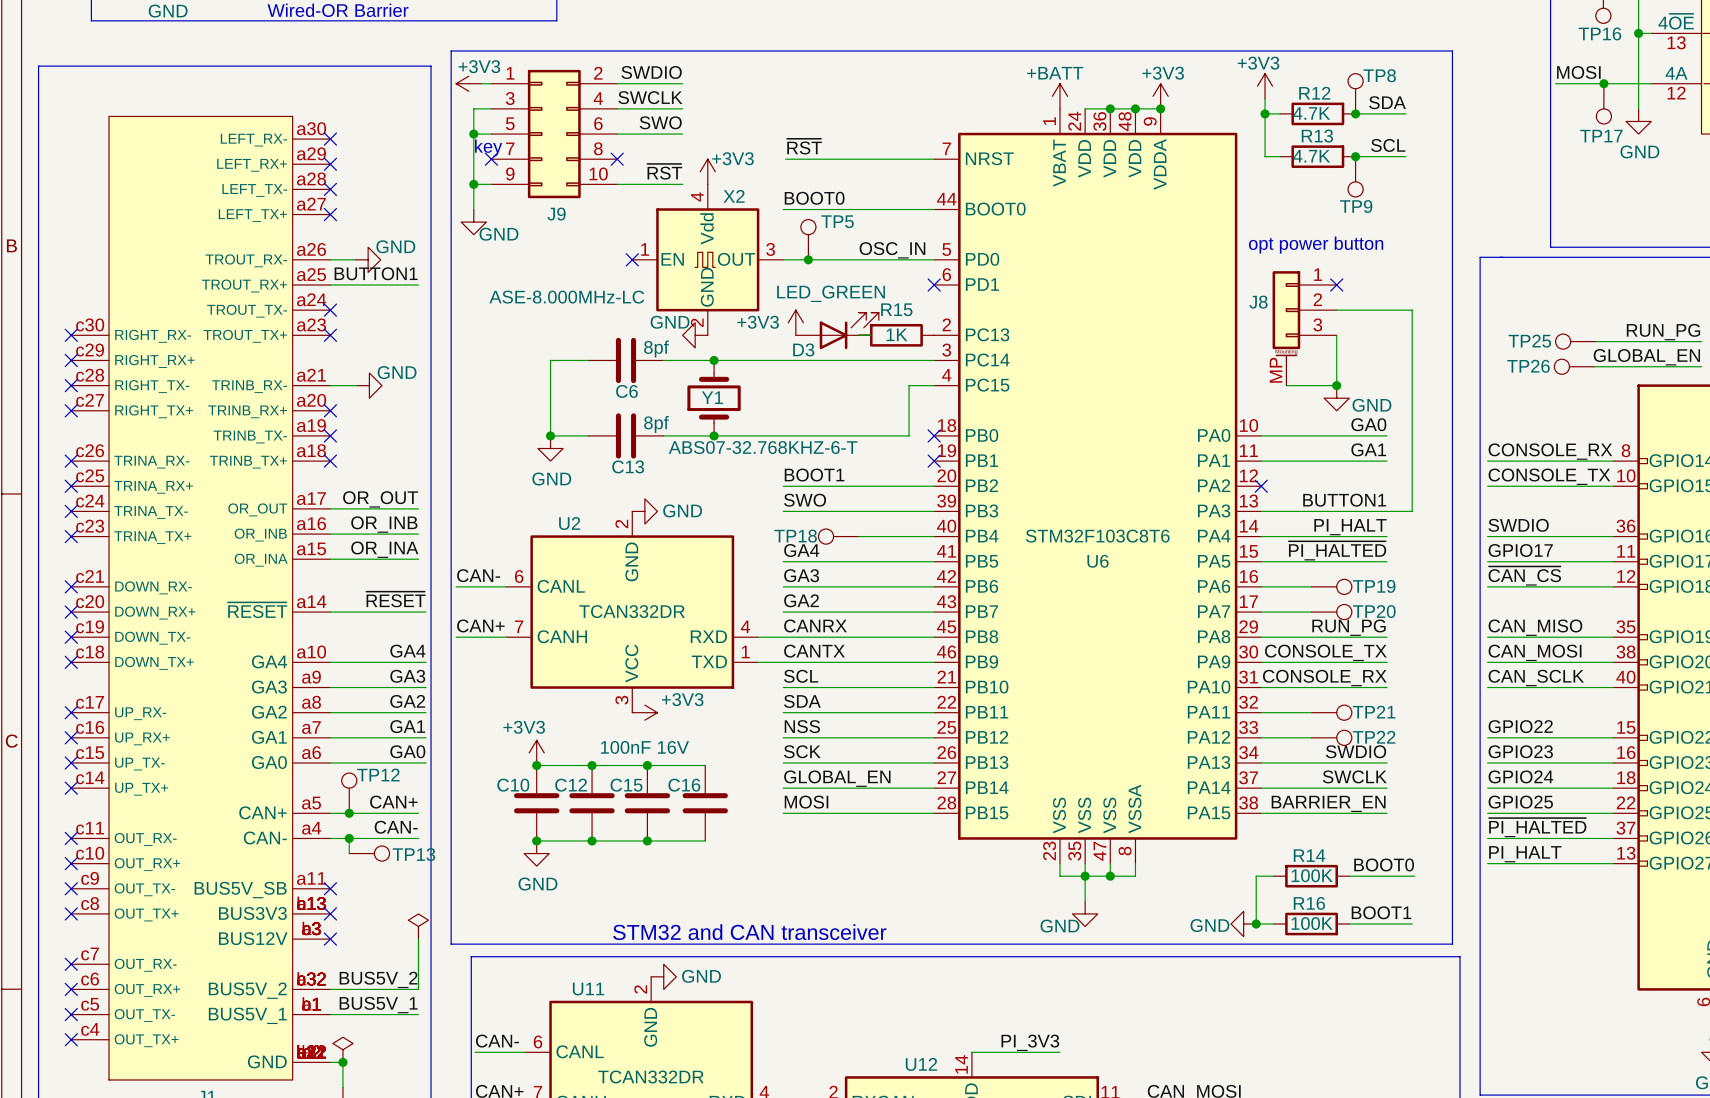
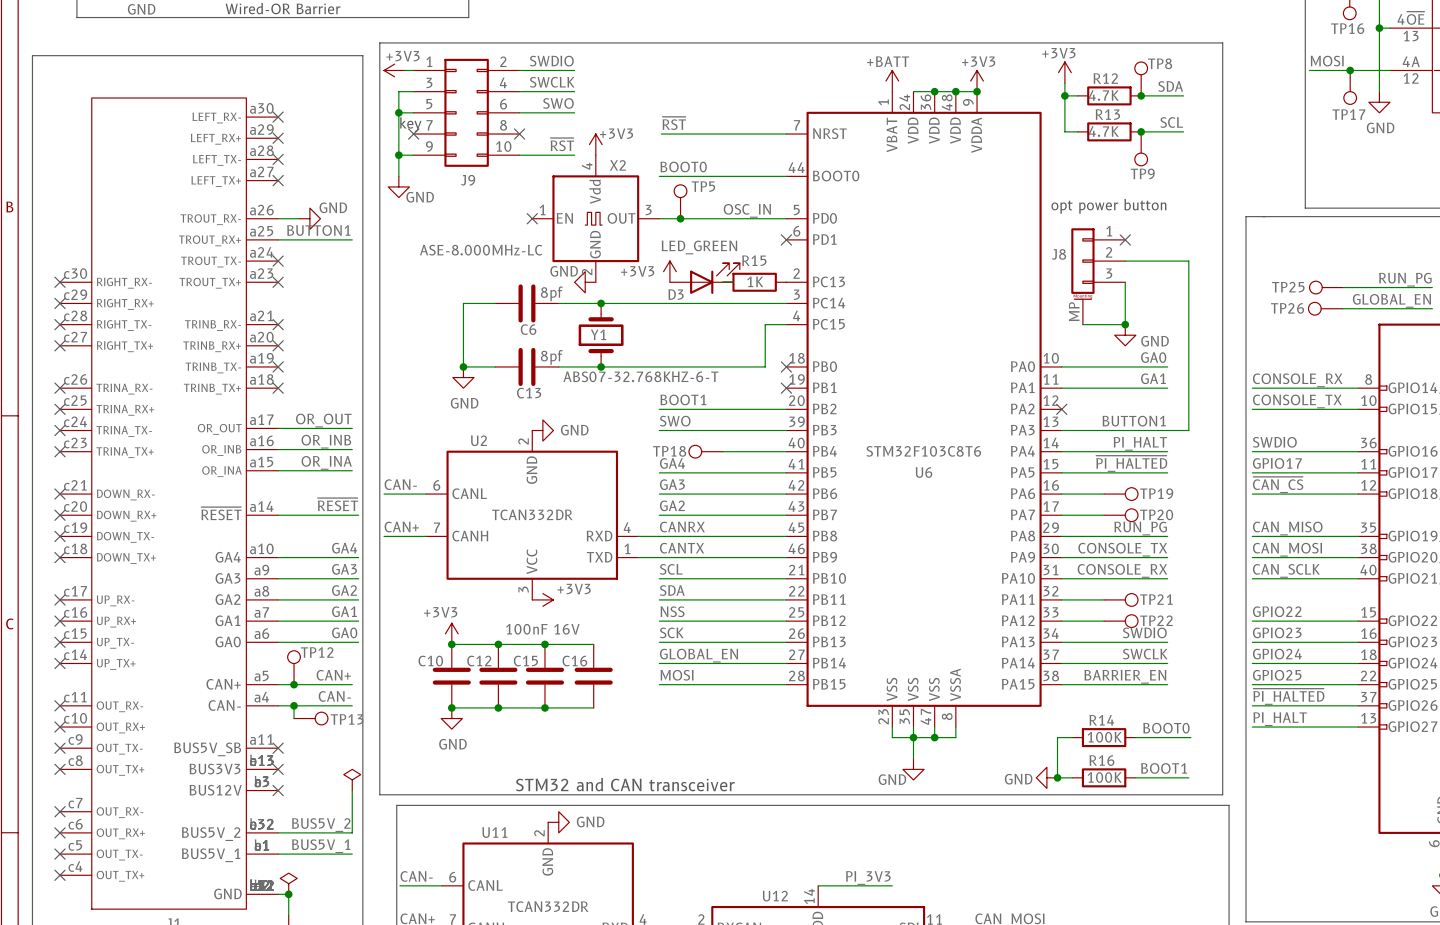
wire: (330, 385) (356, 385) -> none
no-connect mark: none -> (278, 324)
power symbol: GND (369, 385) -> none

